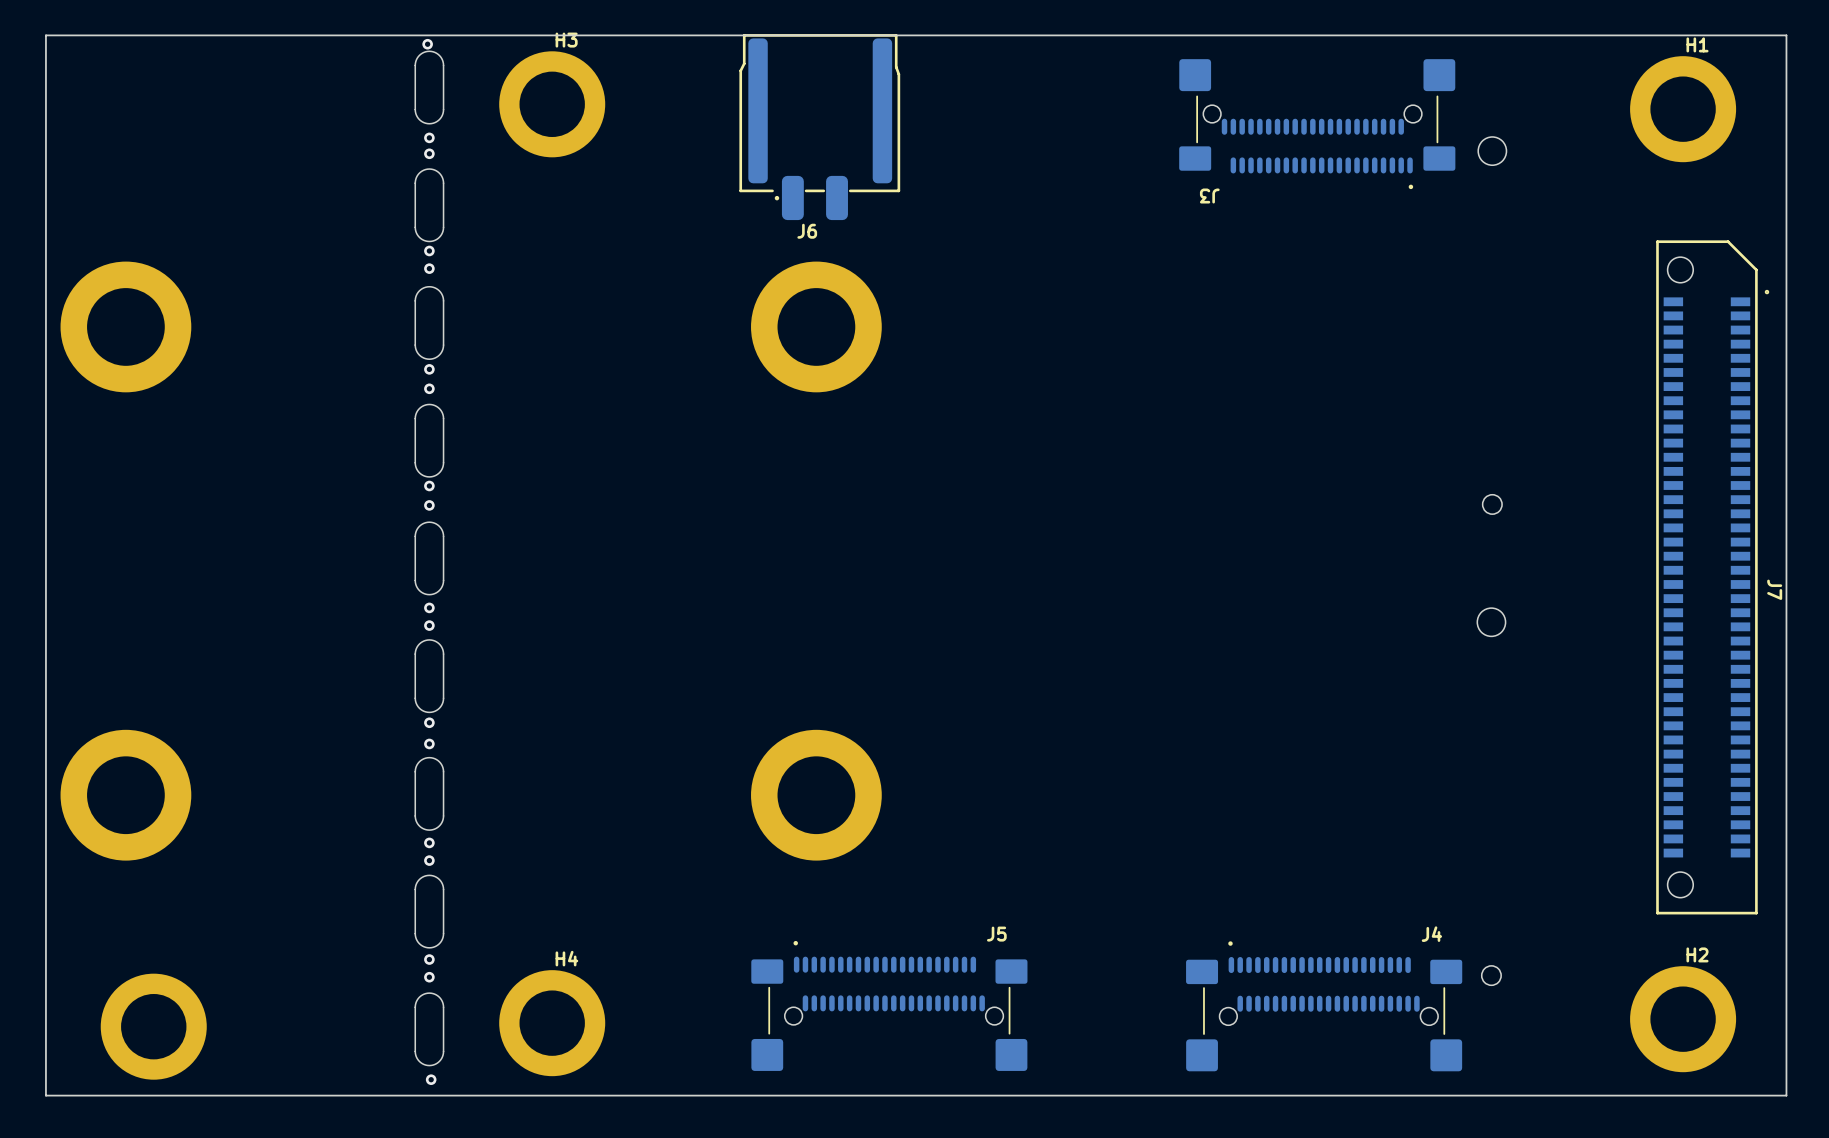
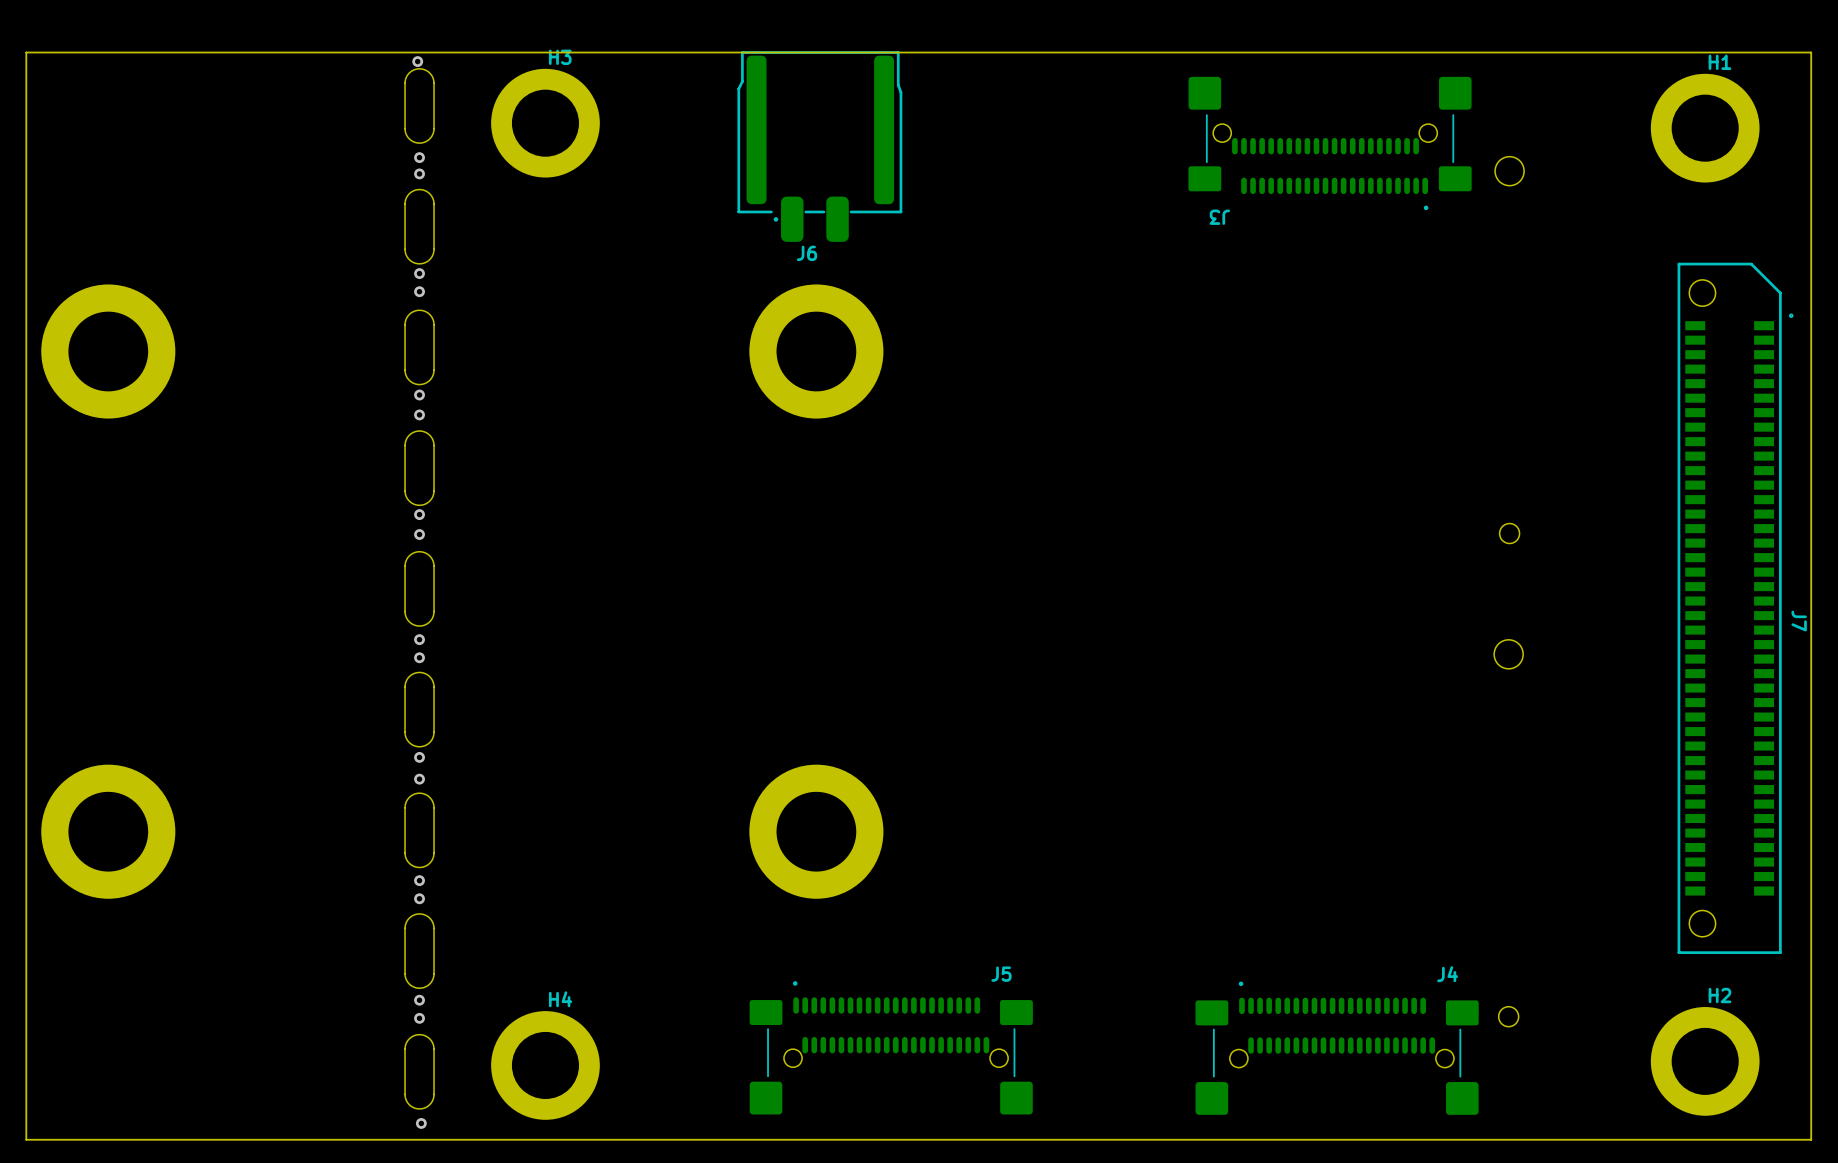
part: (153, 1026) -> none

